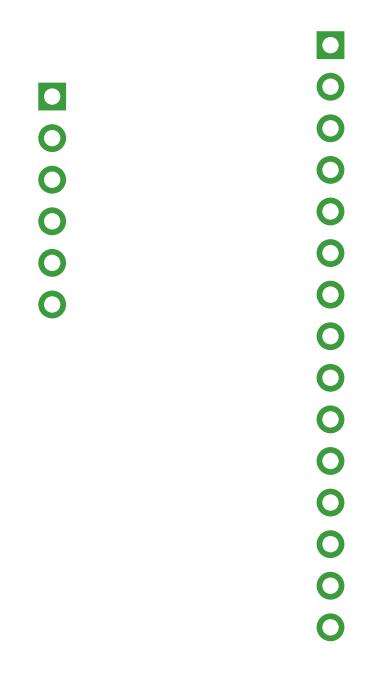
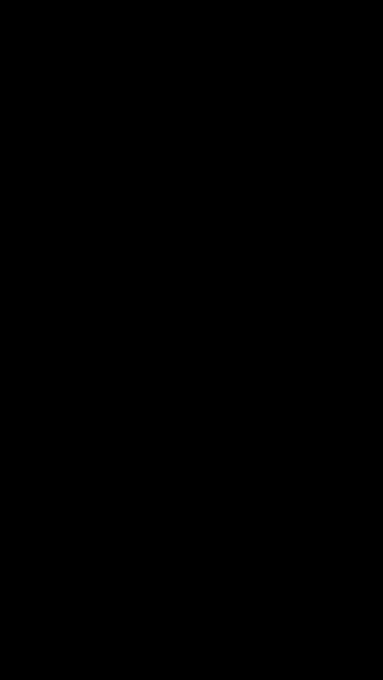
part: (52, 200) -> none
part: (330, 336) -> none

